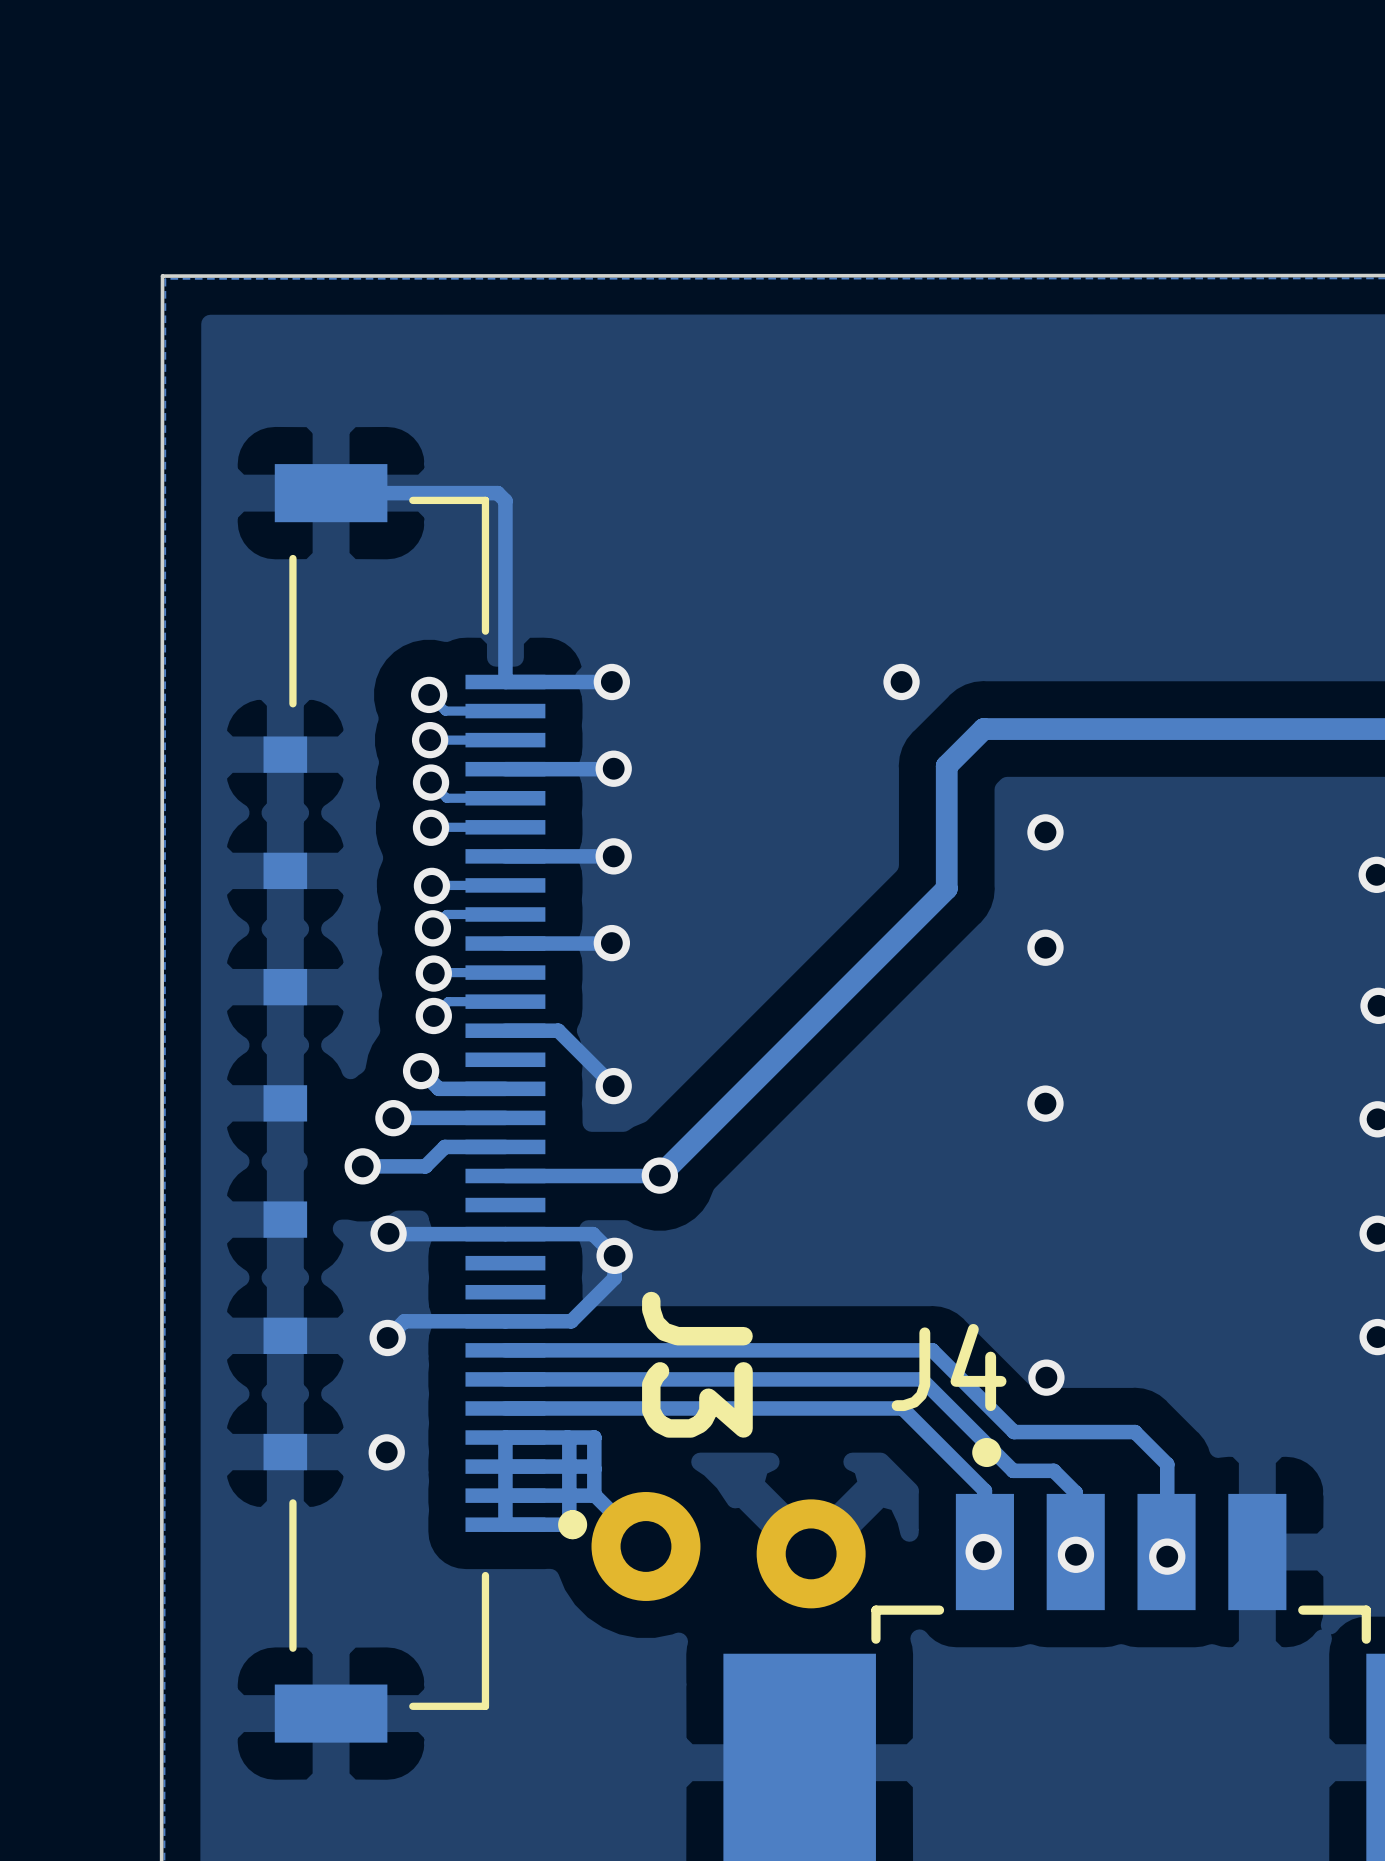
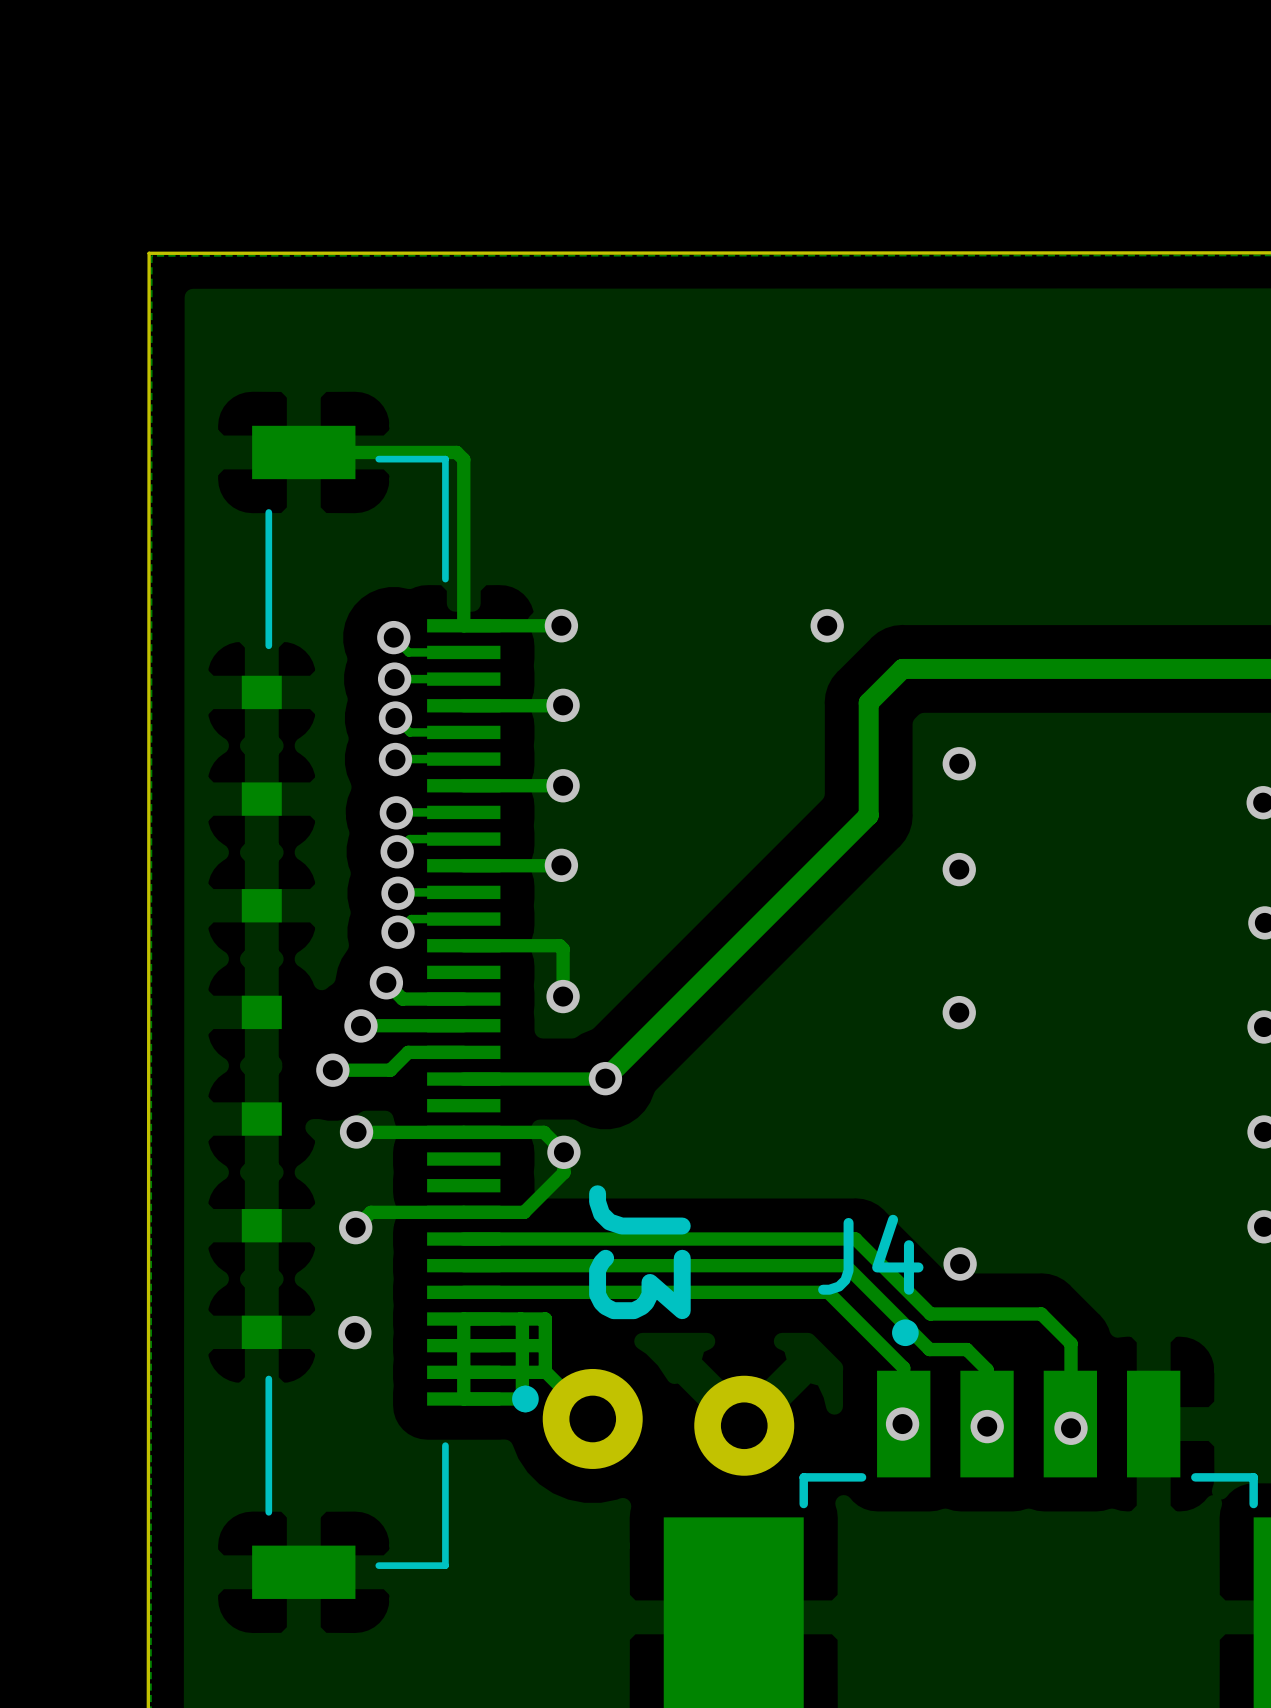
track: (558, 1030) (613, 1086) -> (512, 945) (559, 945) (563, 949) (563, 996)

